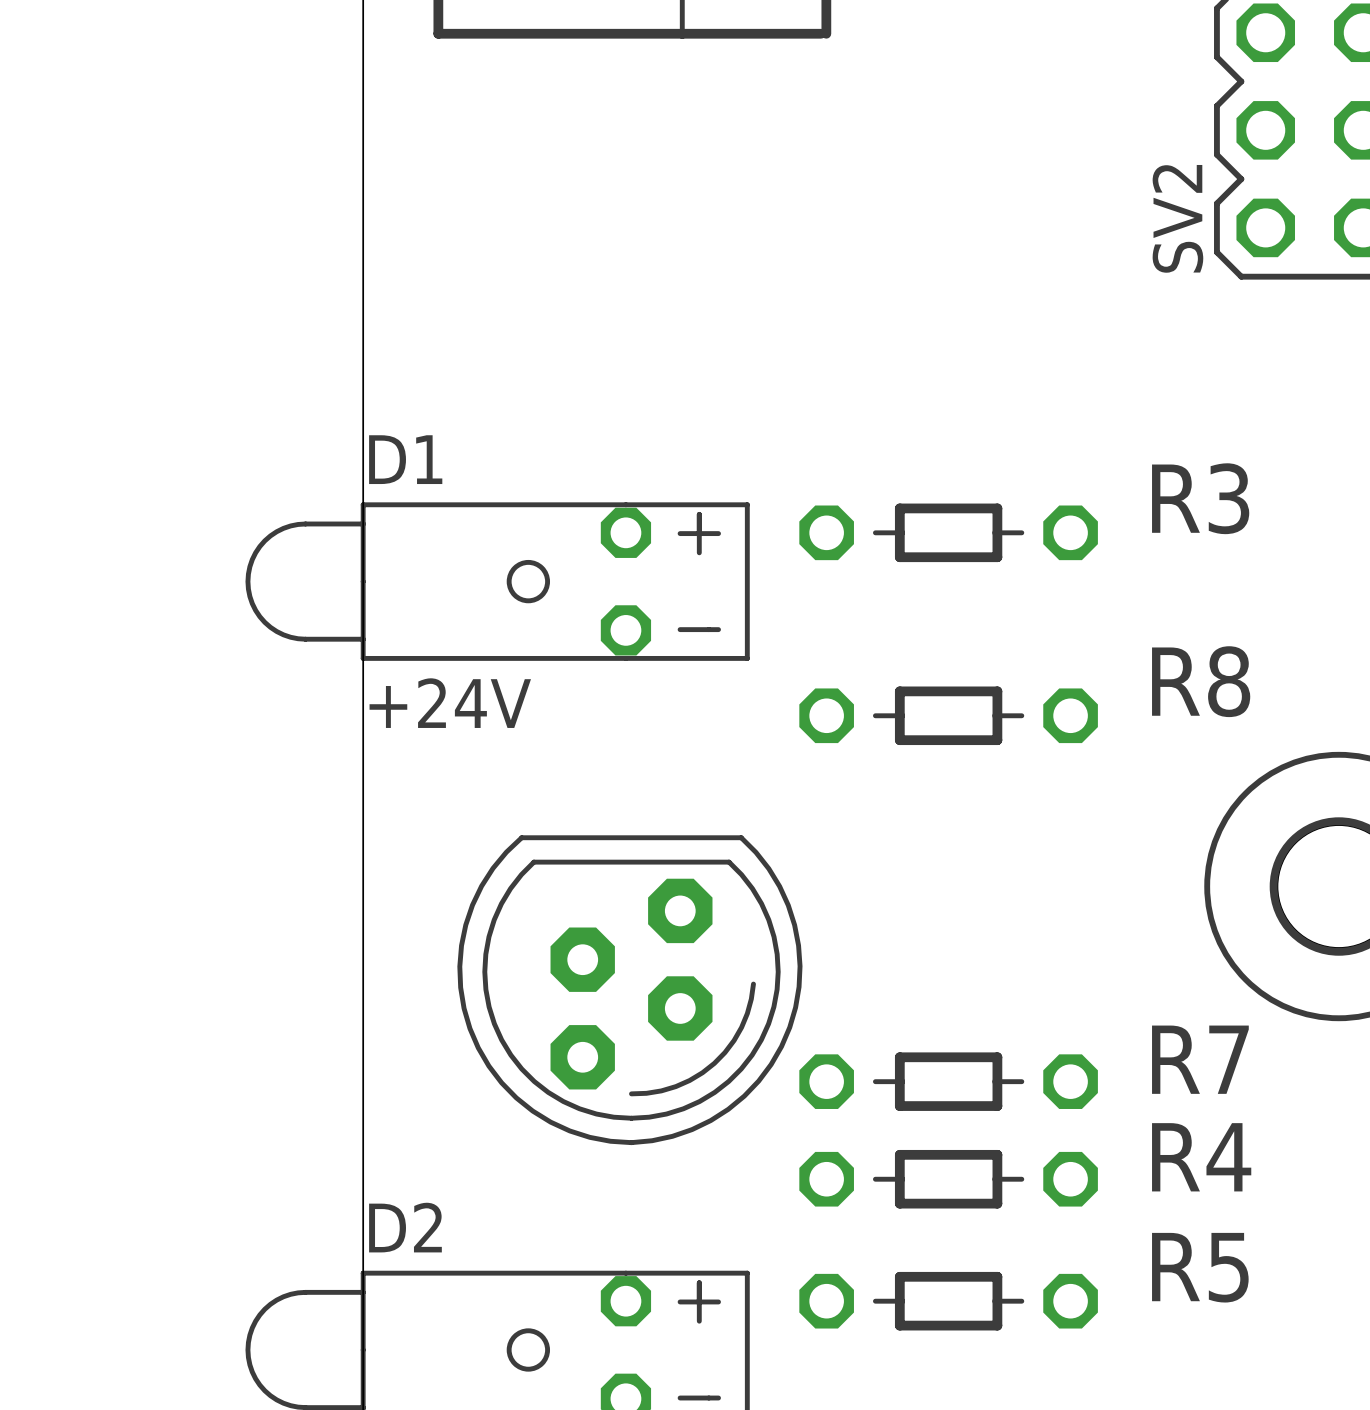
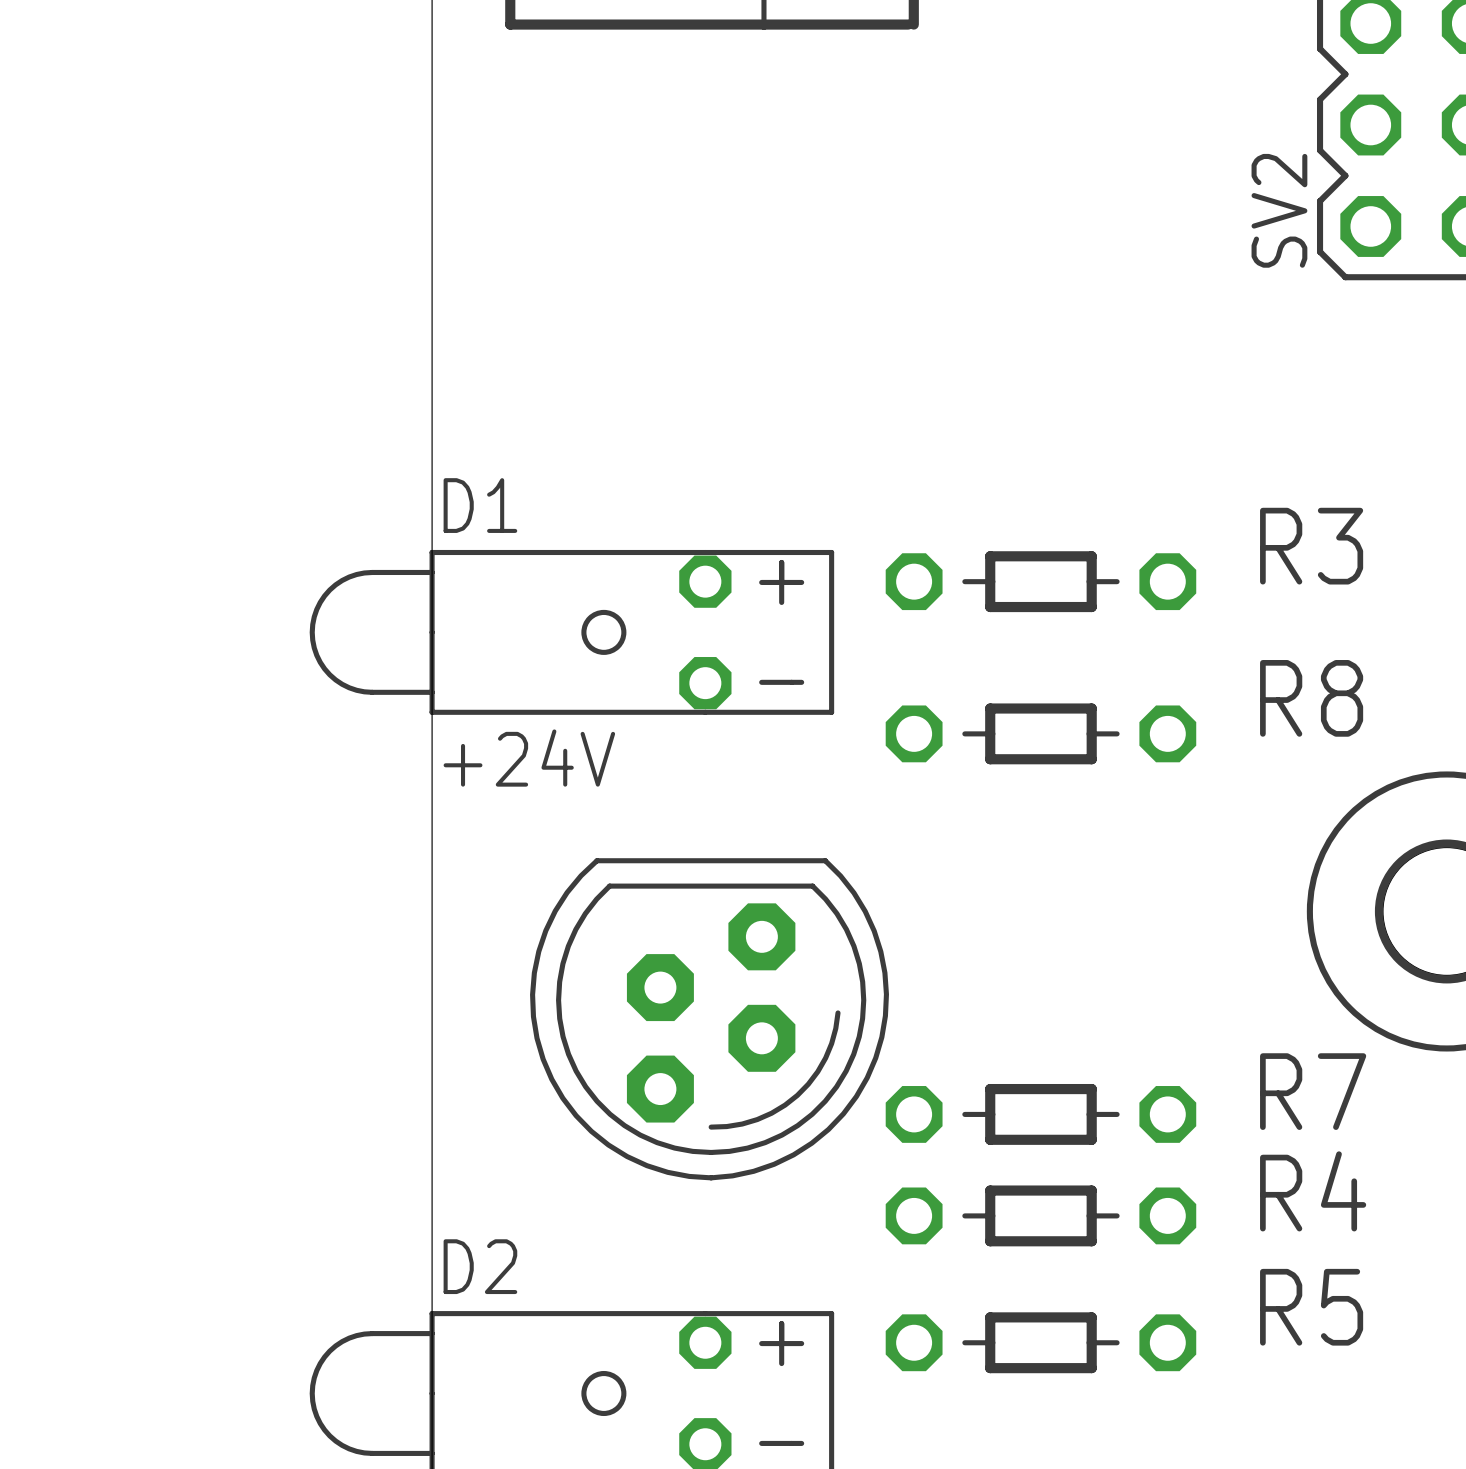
R3 position: (948, 532) -> (1040, 581)
D1 position: (497, 581) -> (571, 632)

